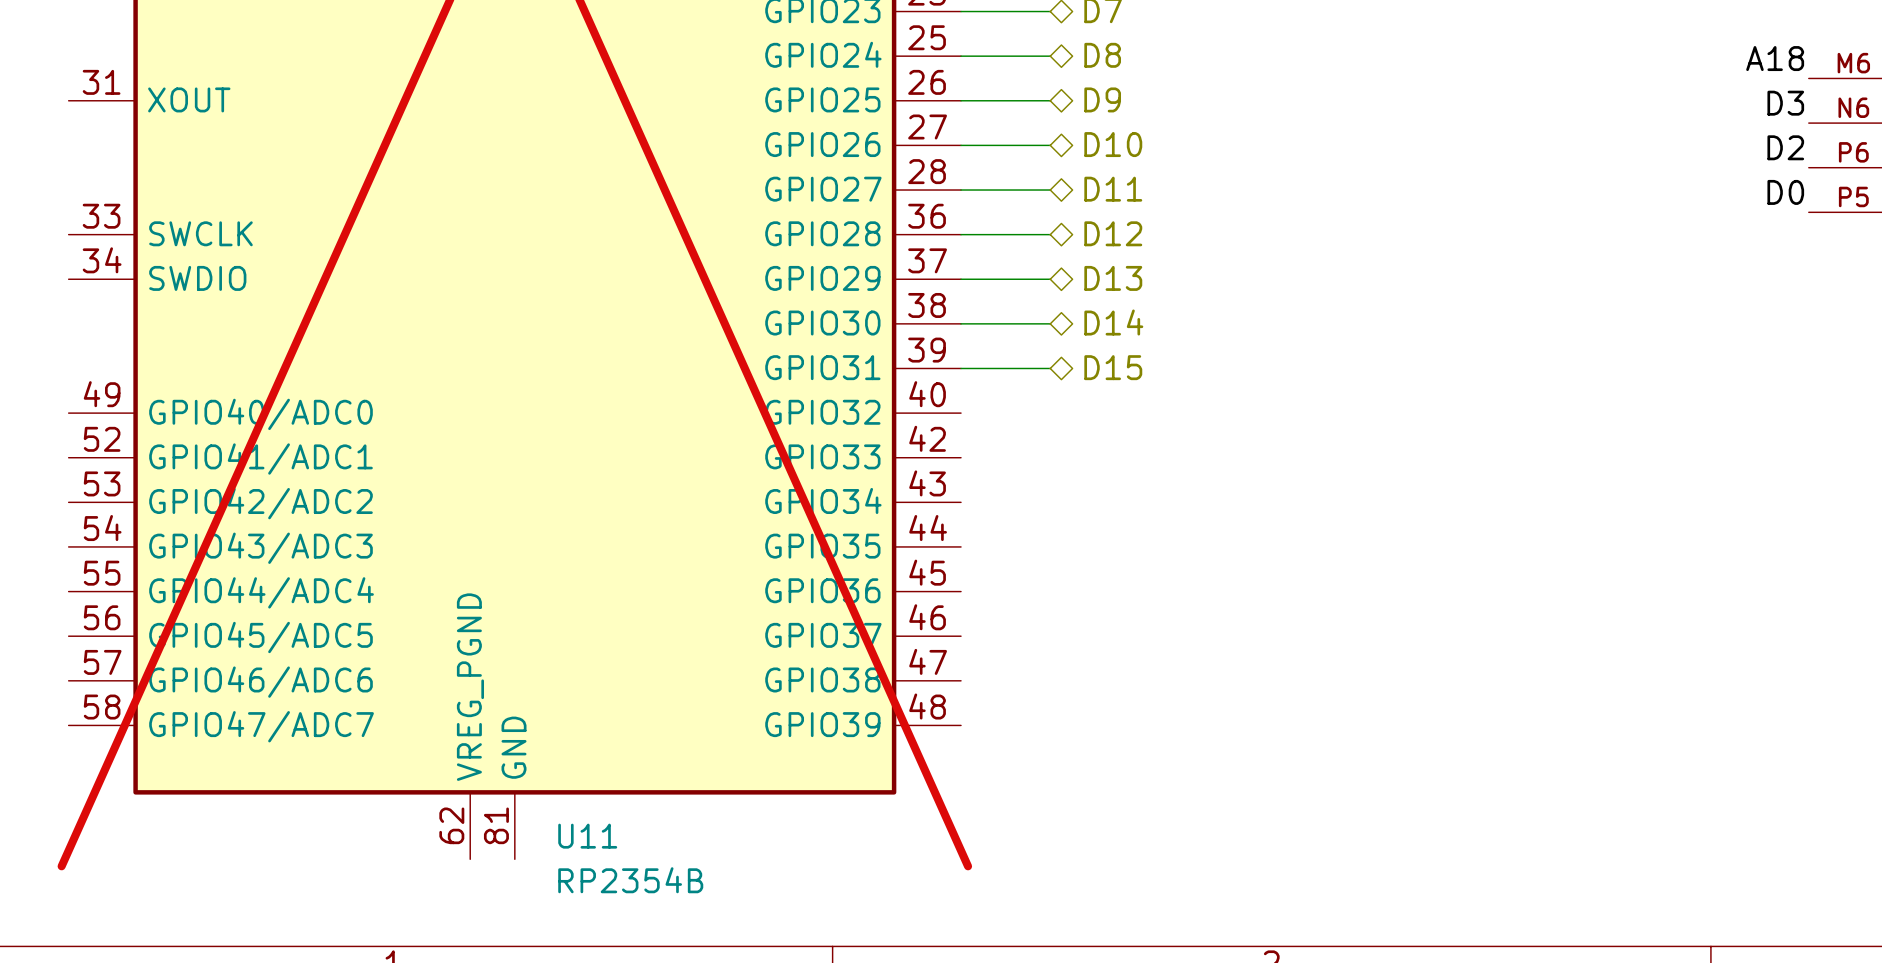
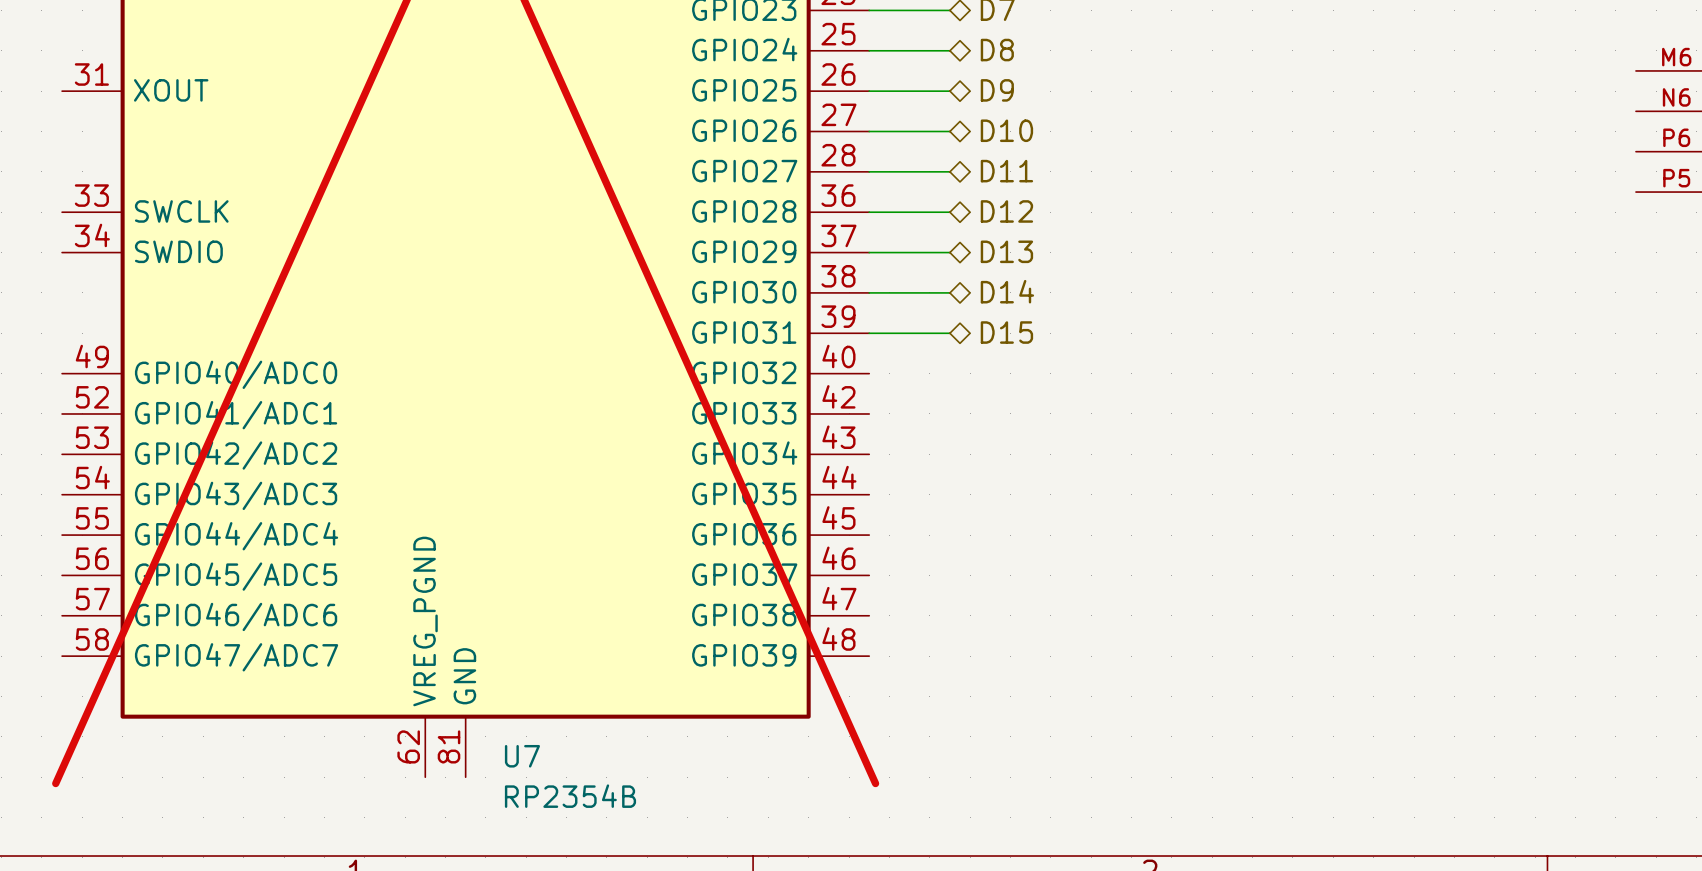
label: A18 (1775, 58) -> none
label: D3 (1785, 103) -> none
label: D2 (1785, 147) -> none
label: D0 (1785, 192) -> none
U11 name: U11 (587, 836) -> U7 (522, 756)

